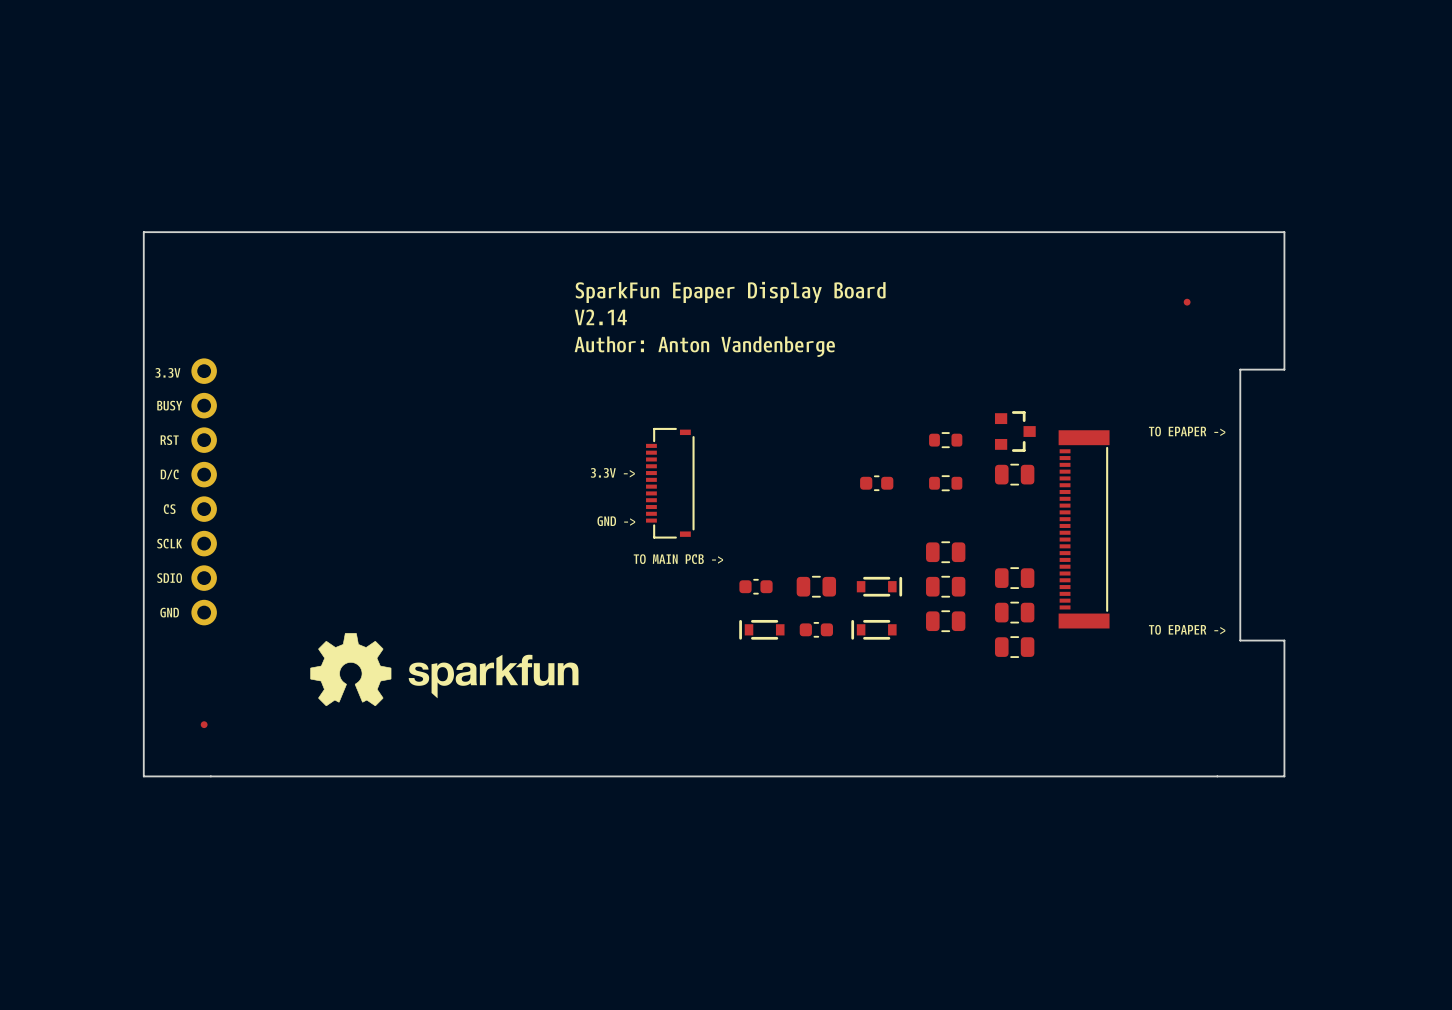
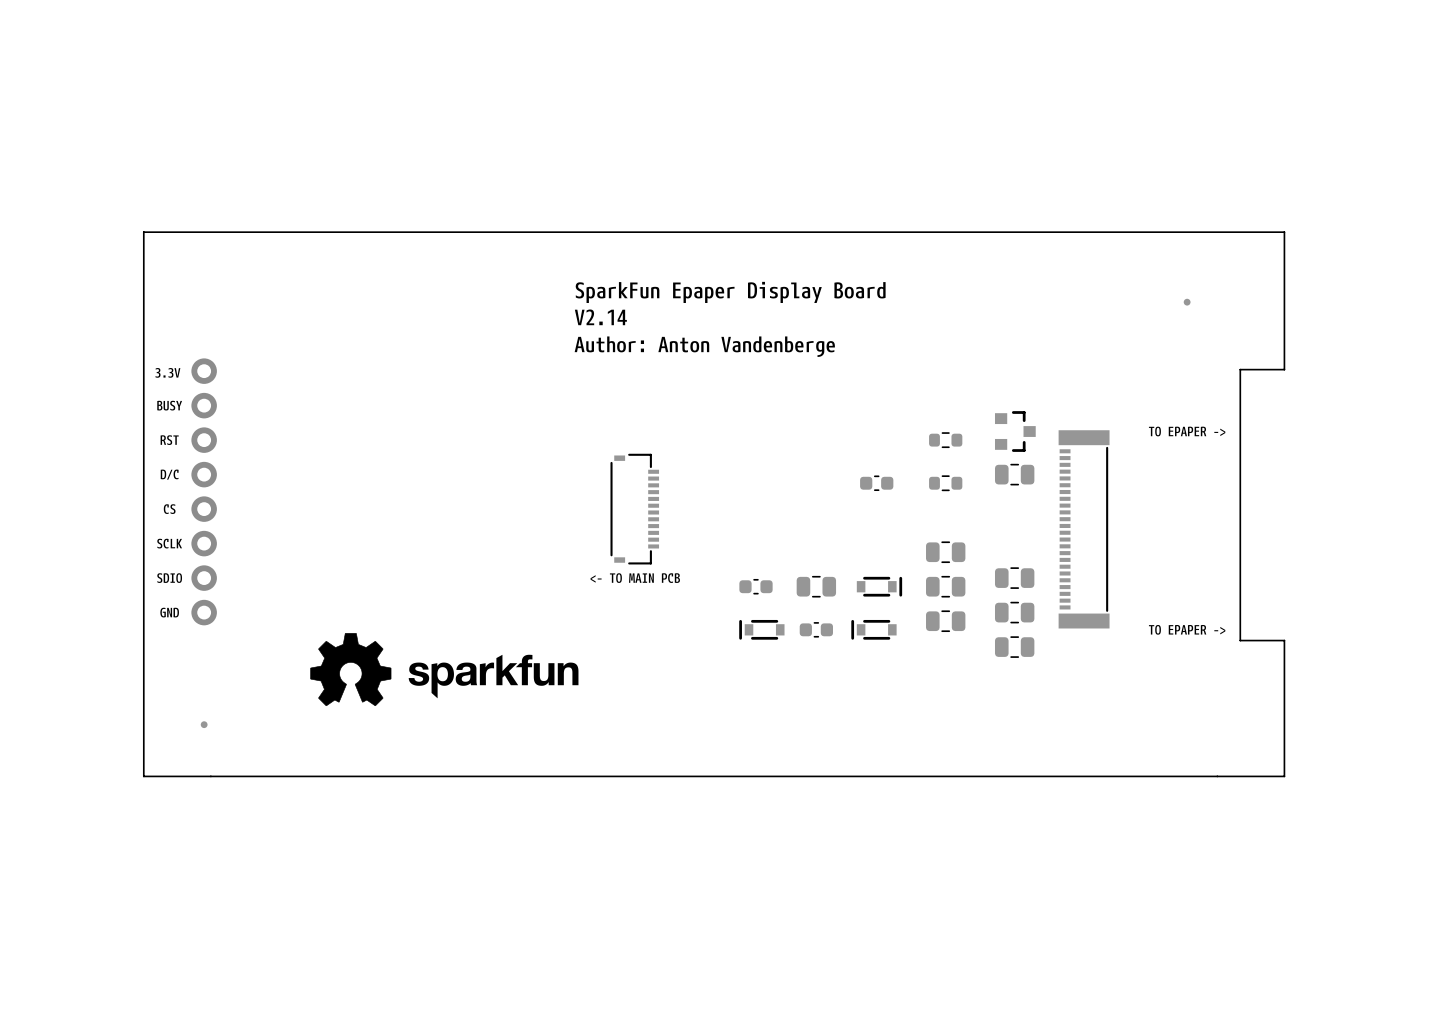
drawing: [590, 468, 635, 478] -> none
part rotation: 0° (670, 483) -> 180° (634, 509)
drawing: [597, 516, 636, 527] -> none
drawing: [633, 554, 724, 564] -> none
drawing: none -> [590, 573, 680, 583]

